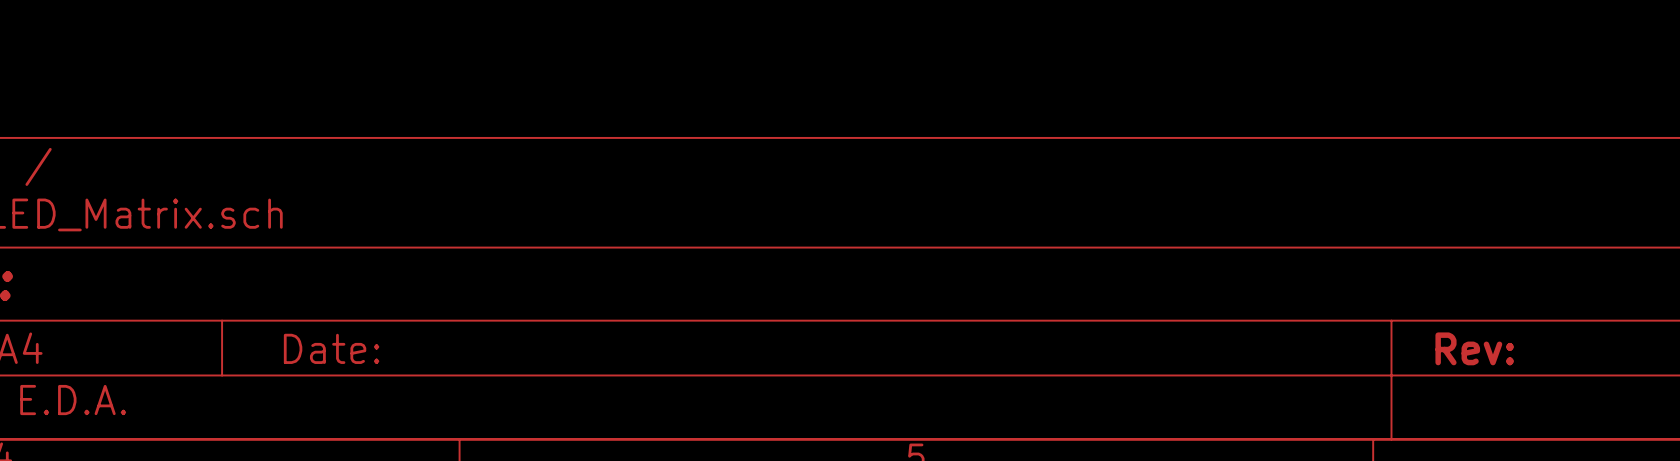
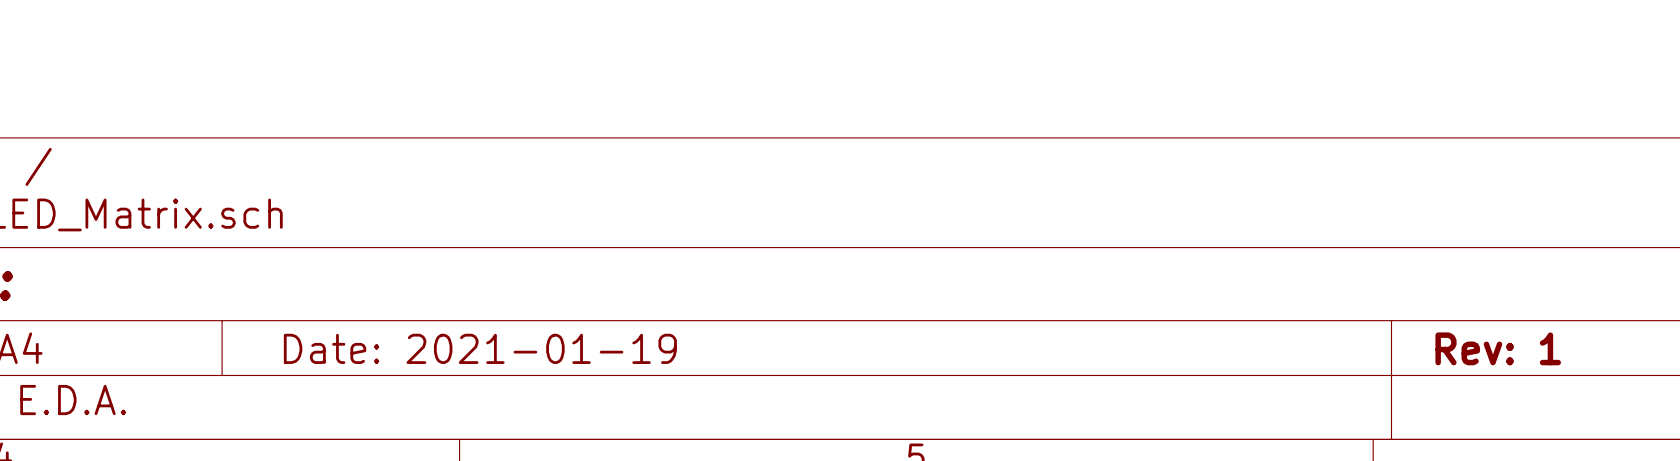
title block: Date: (331, 348) -> Date: 2021-01-19 (480, 348)
title block: Rev: (1474, 348) -> Rev: 1 (1498, 348)

